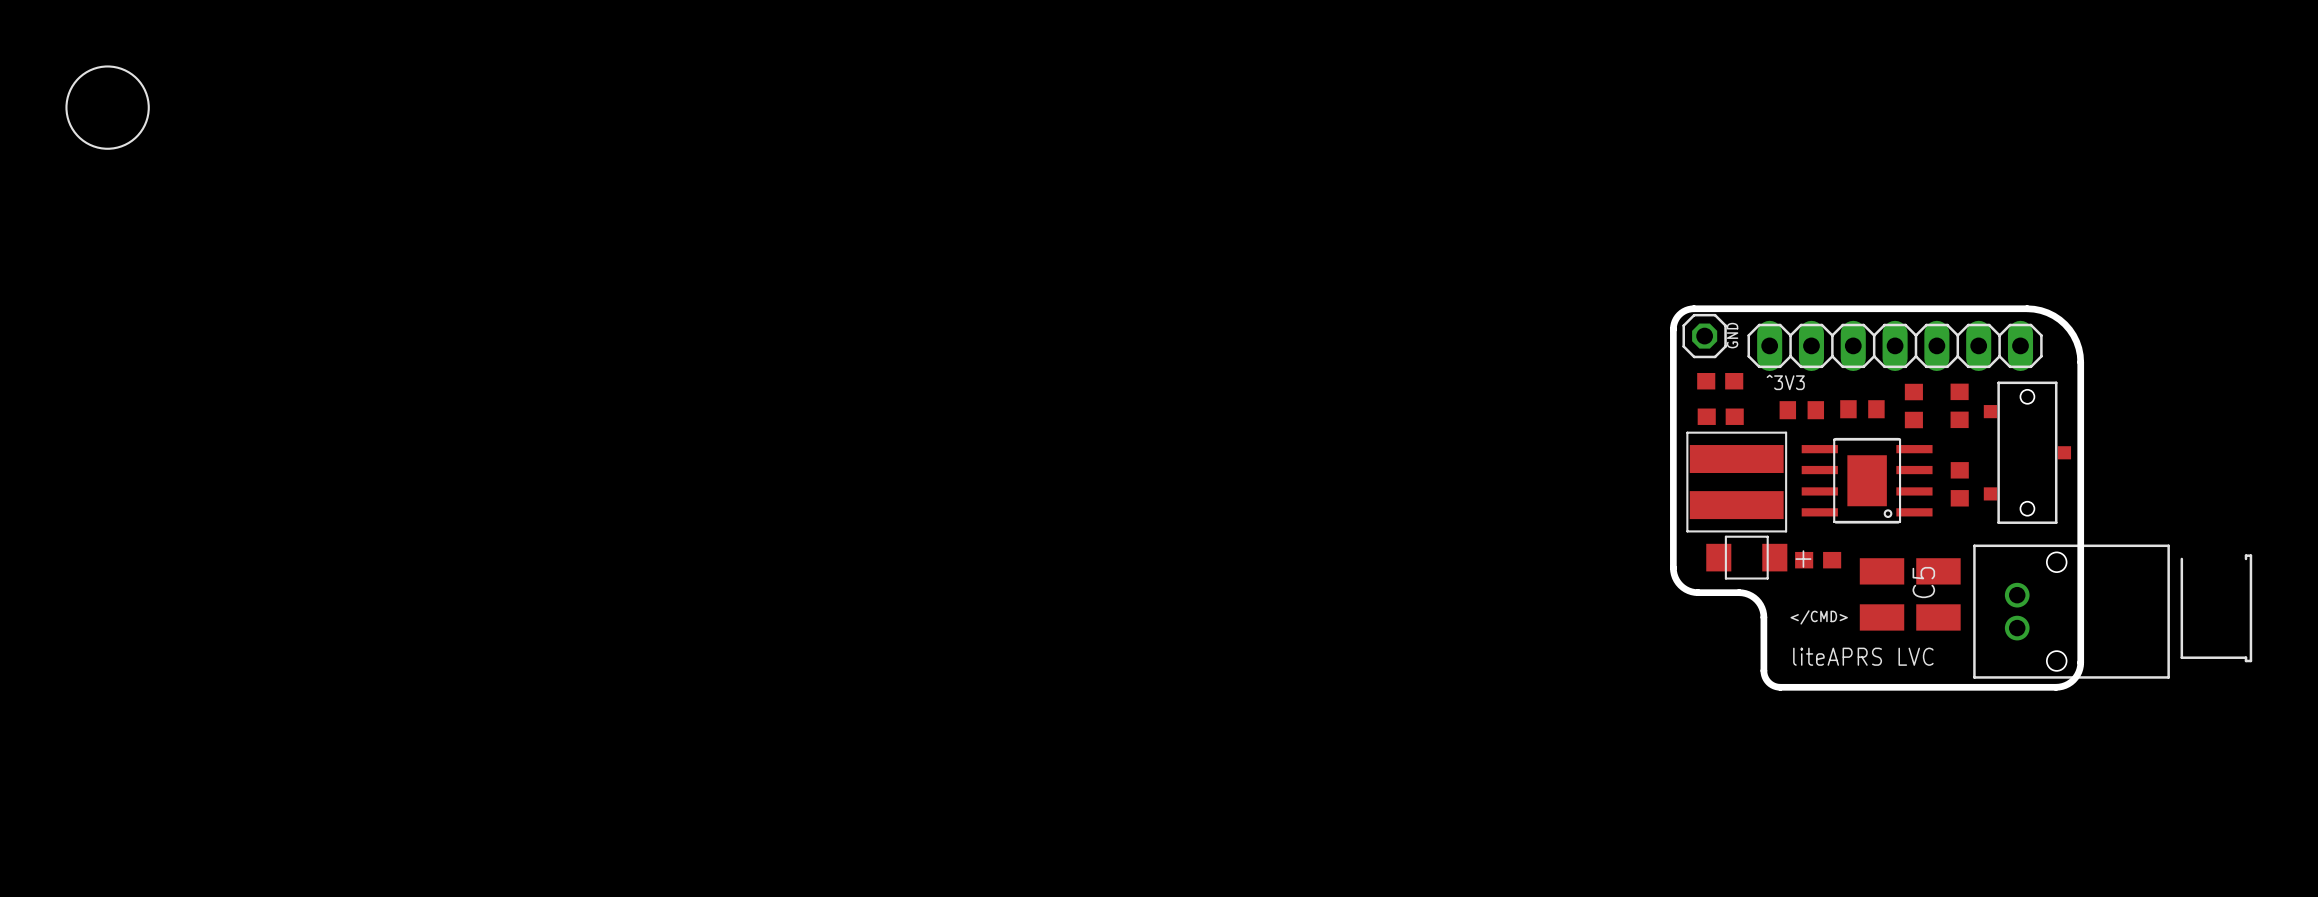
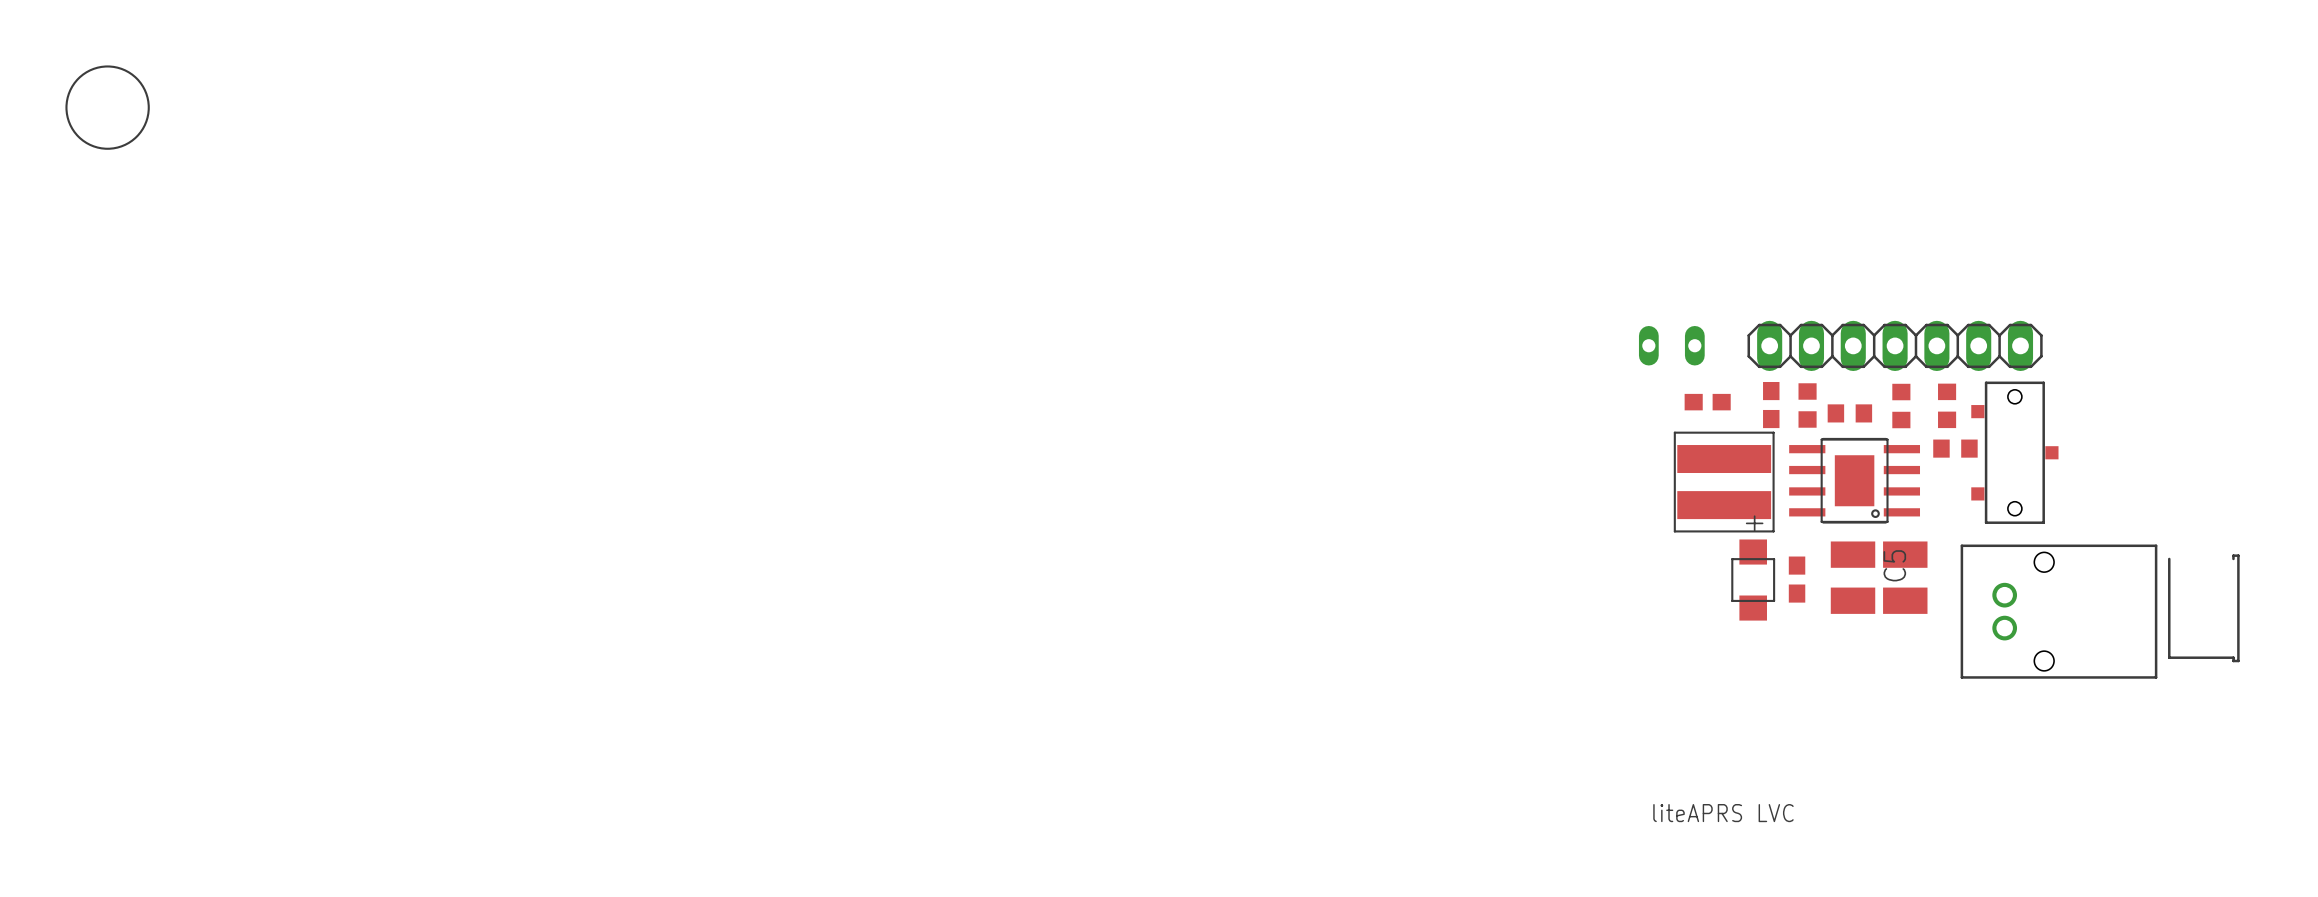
board edge: (1693, 308) (2027, 308) (2047, 312) (2065, 324) (2076, 341) (2080, 362) (2080, 662) (2078, 672) (2073, 680) (2065, 685) (2056, 687) (1780, 687) (1768, 682) (1764, 672) (1763, 614) (1758, 602) (1751, 595) (1742, 592) (1691, 591) (1680, 585) (1674, 574) (1673, 326) (1676, 319) (1681, 313) (1693, 308) -> none
text: GND (1732, 335) -> none
part: (1704, 336) -> none
part: none -> (1671, 345)
part: (1720, 381) -> none
text: ^3V3 (1785, 382) -> none
part: none -> (1707, 402)
part: none -> (1771, 405)
part position: (1959, 405) -> (1947, 405)
part position: (1913, 406) -> (1901, 406)
part position: (1862, 409) -> (1849, 413)
part rotation: 0° (1801, 410) -> 90° clockwise (1807, 405)
part: (1720, 416) -> none
part position: (2027, 452) -> (2014, 452)
part position: (1867, 480) -> (1854, 480)
part position: (1736, 482) -> (1724, 482)
part rotation: 0° (1959, 484) -> 90° clockwise (1955, 448)
part position: (1959, 484) -> (1955, 448)
part rotation: 0° (1746, 557) -> 90° counterclockwise (1753, 580)
part rotation: 0° (1818, 560) -> 90° clockwise (1797, 579)
part position: (1818, 560) -> (1797, 579)
C5 position: (1882, 594) -> (1853, 577)
part position: (1938, 594) -> (1905, 577)
part position: (2112, 611) -> (2100, 611)
text: </CMD> (1819, 617) -> none
text position: liteAPRS LVC (1863, 656) -> liteAPRS LVC (1723, 813)

